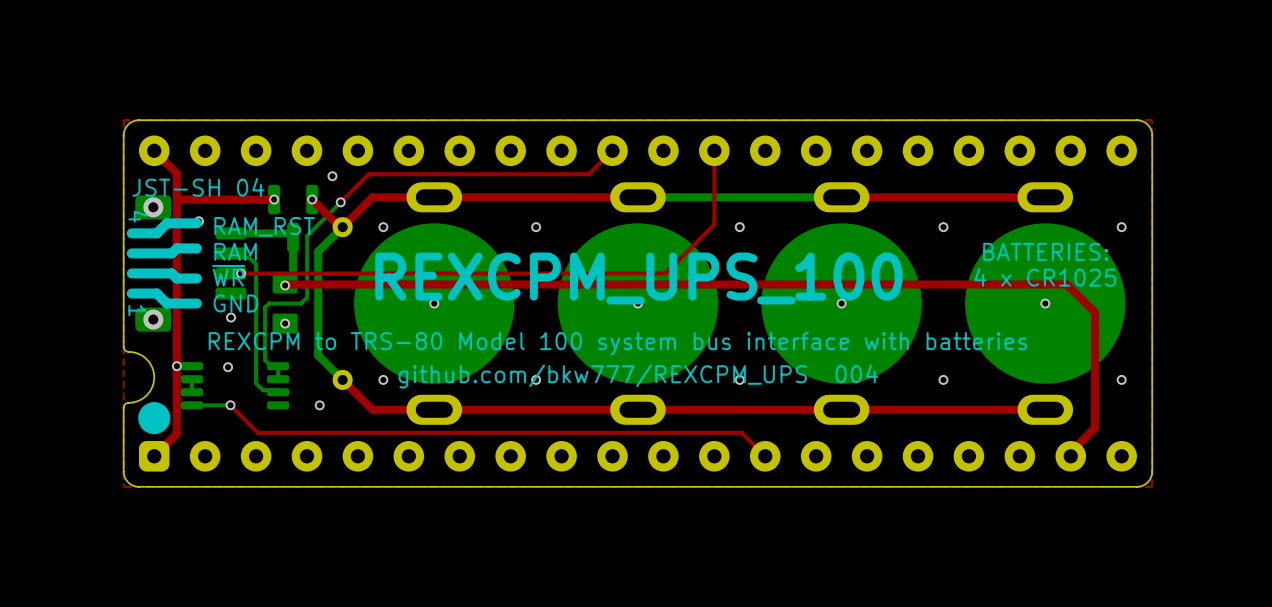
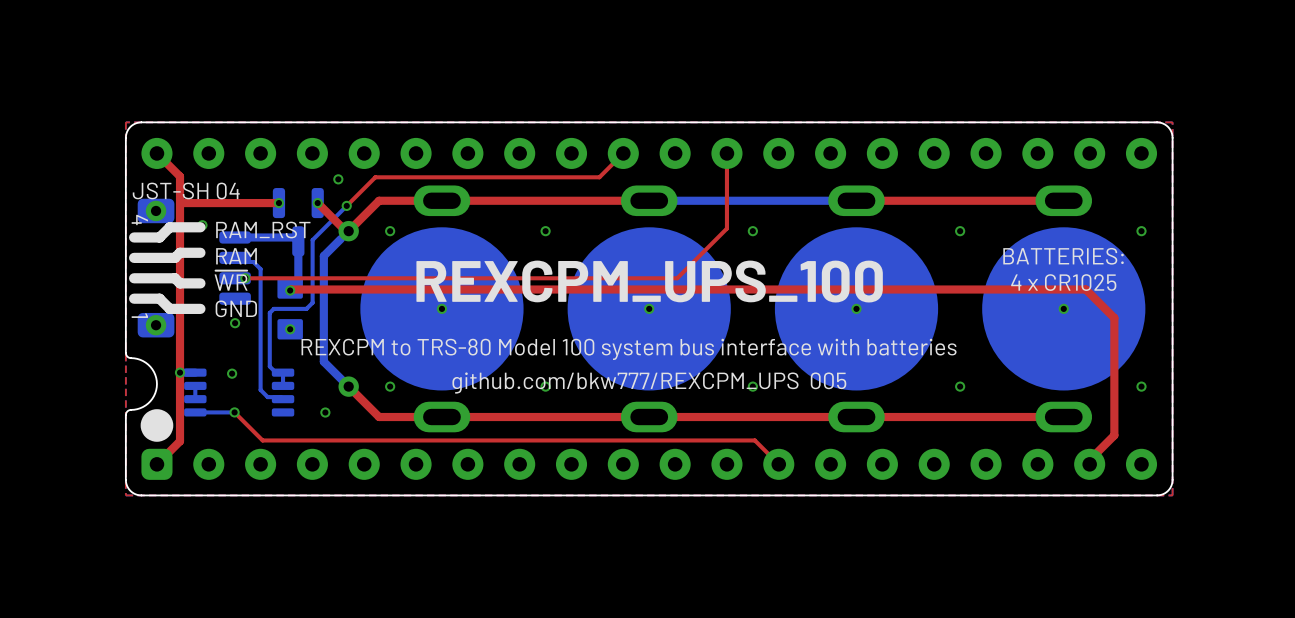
text: github.com/bkw777/REXCPM_UPS 004 (638, 376) -> github.com/bkw777/REXCPM_UPS 005 (649, 383)

